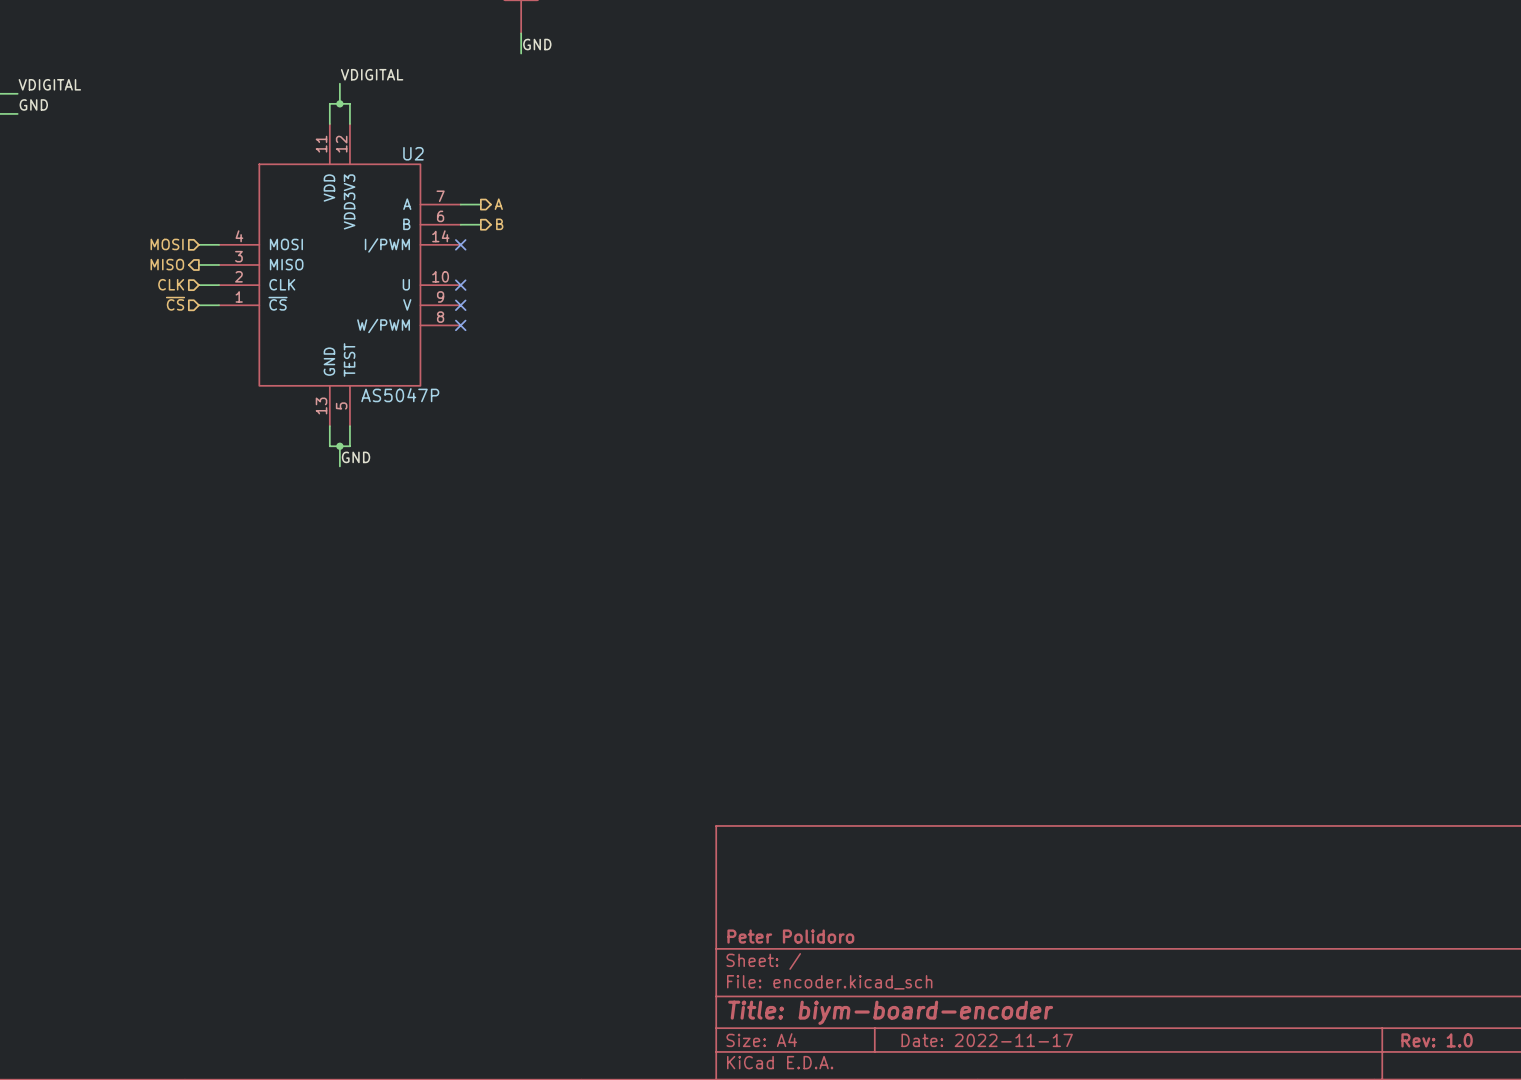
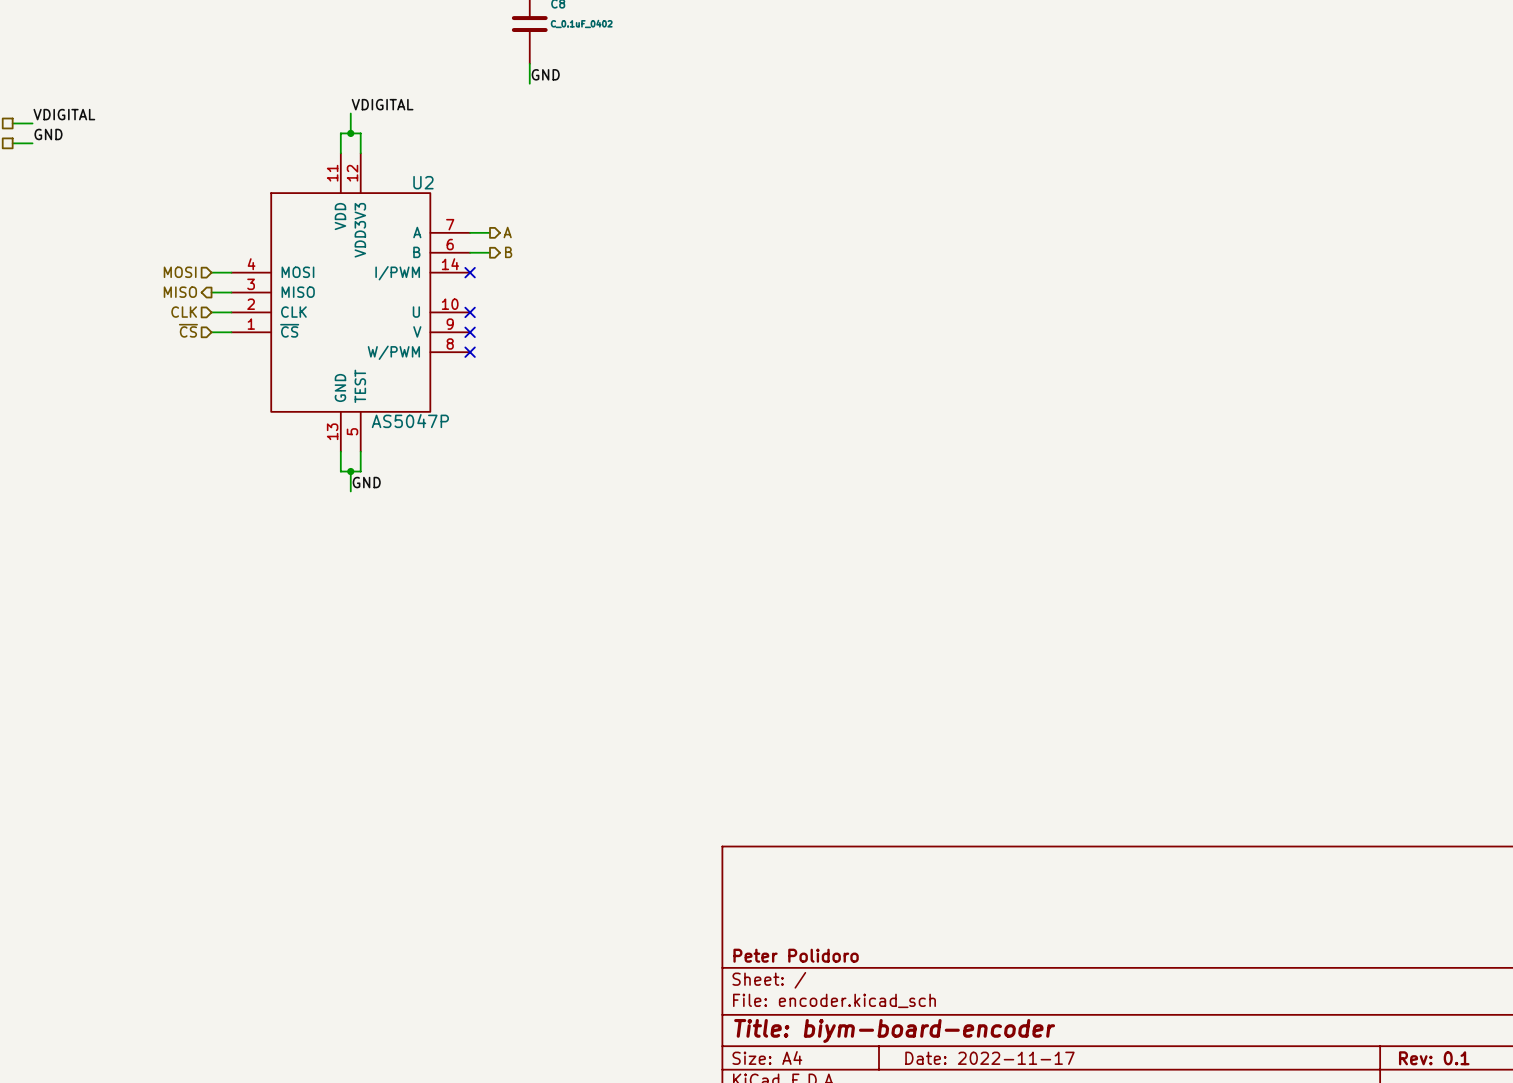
title block: Rev: 1.0 (1437, 1040) -> Rev: 0.1 (1434, 1058)

